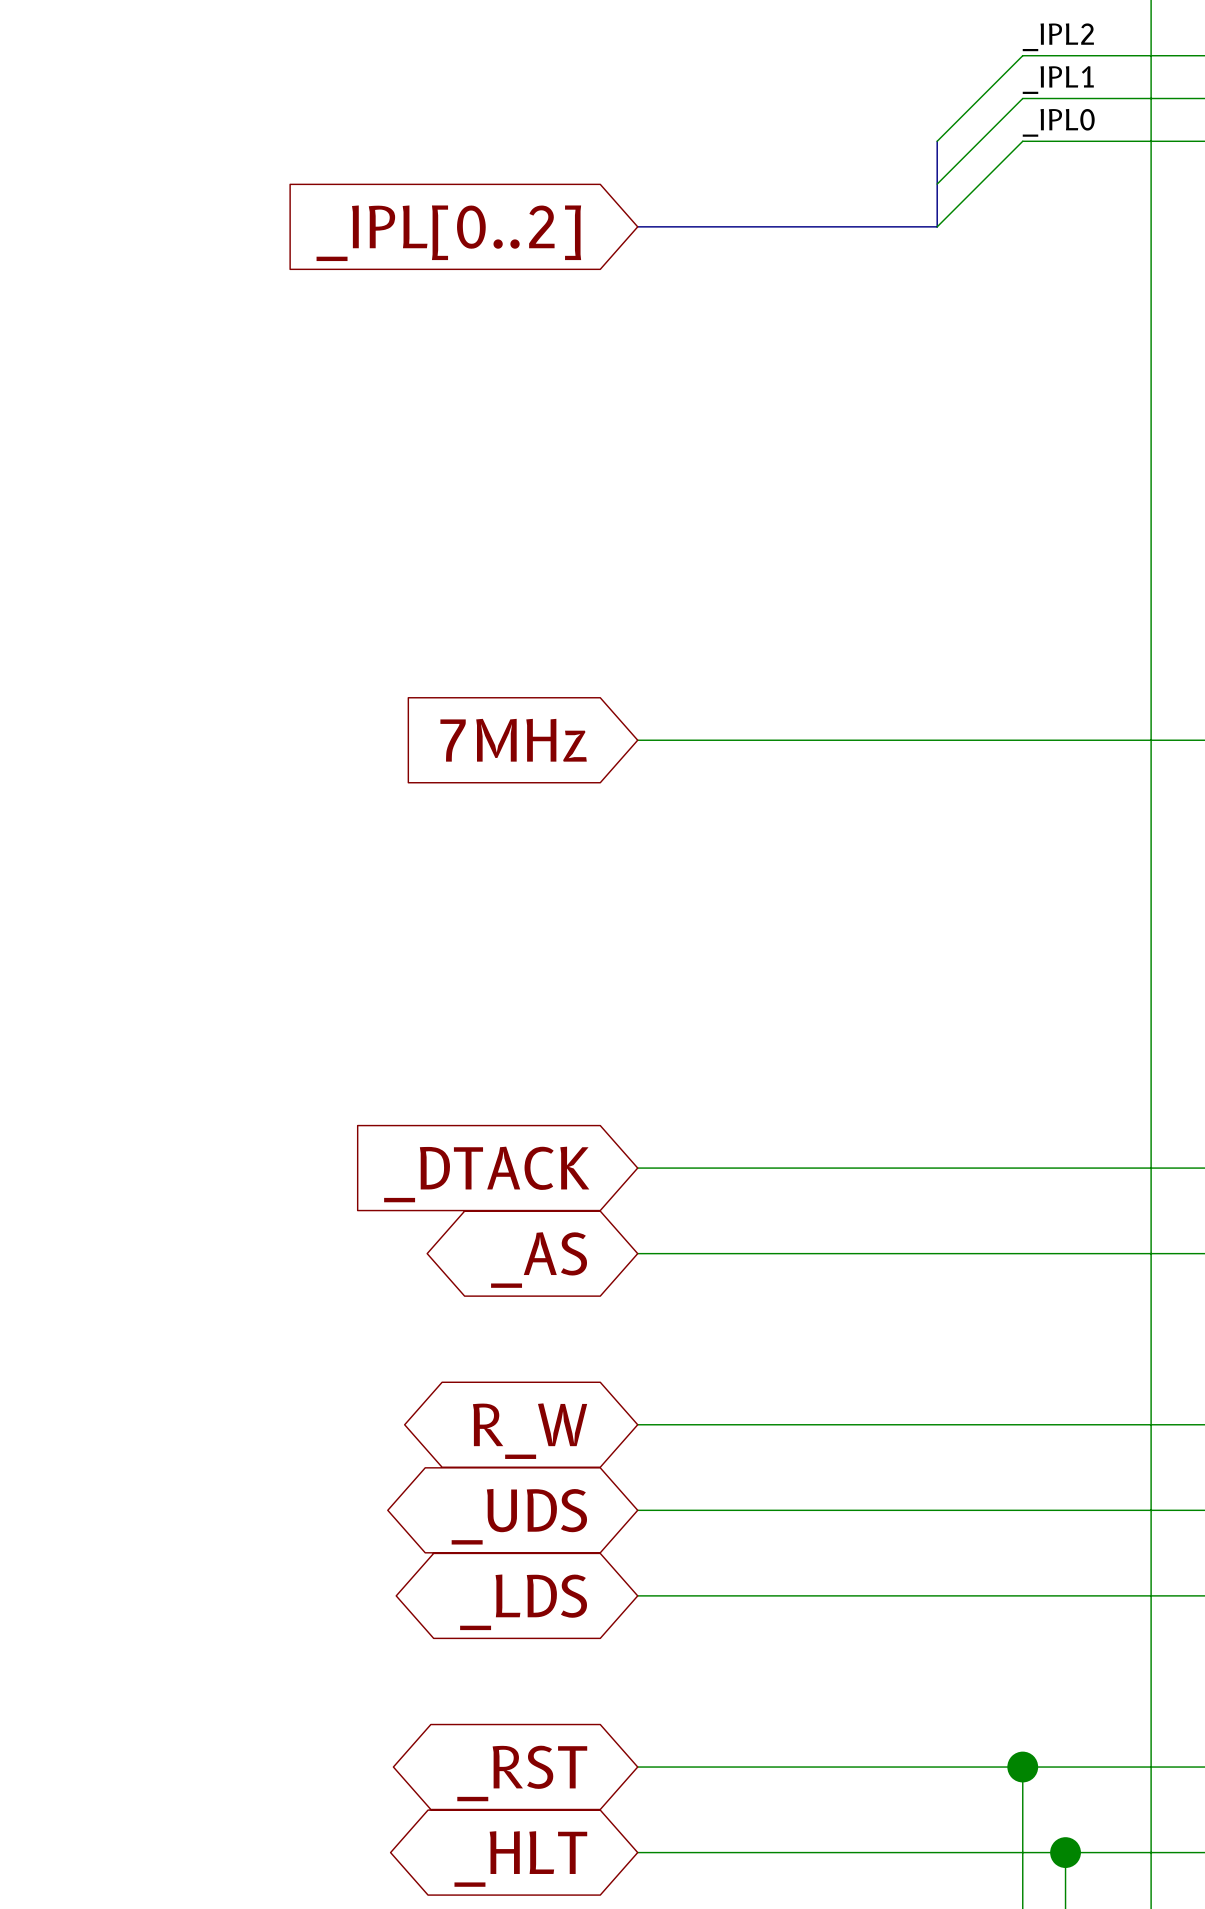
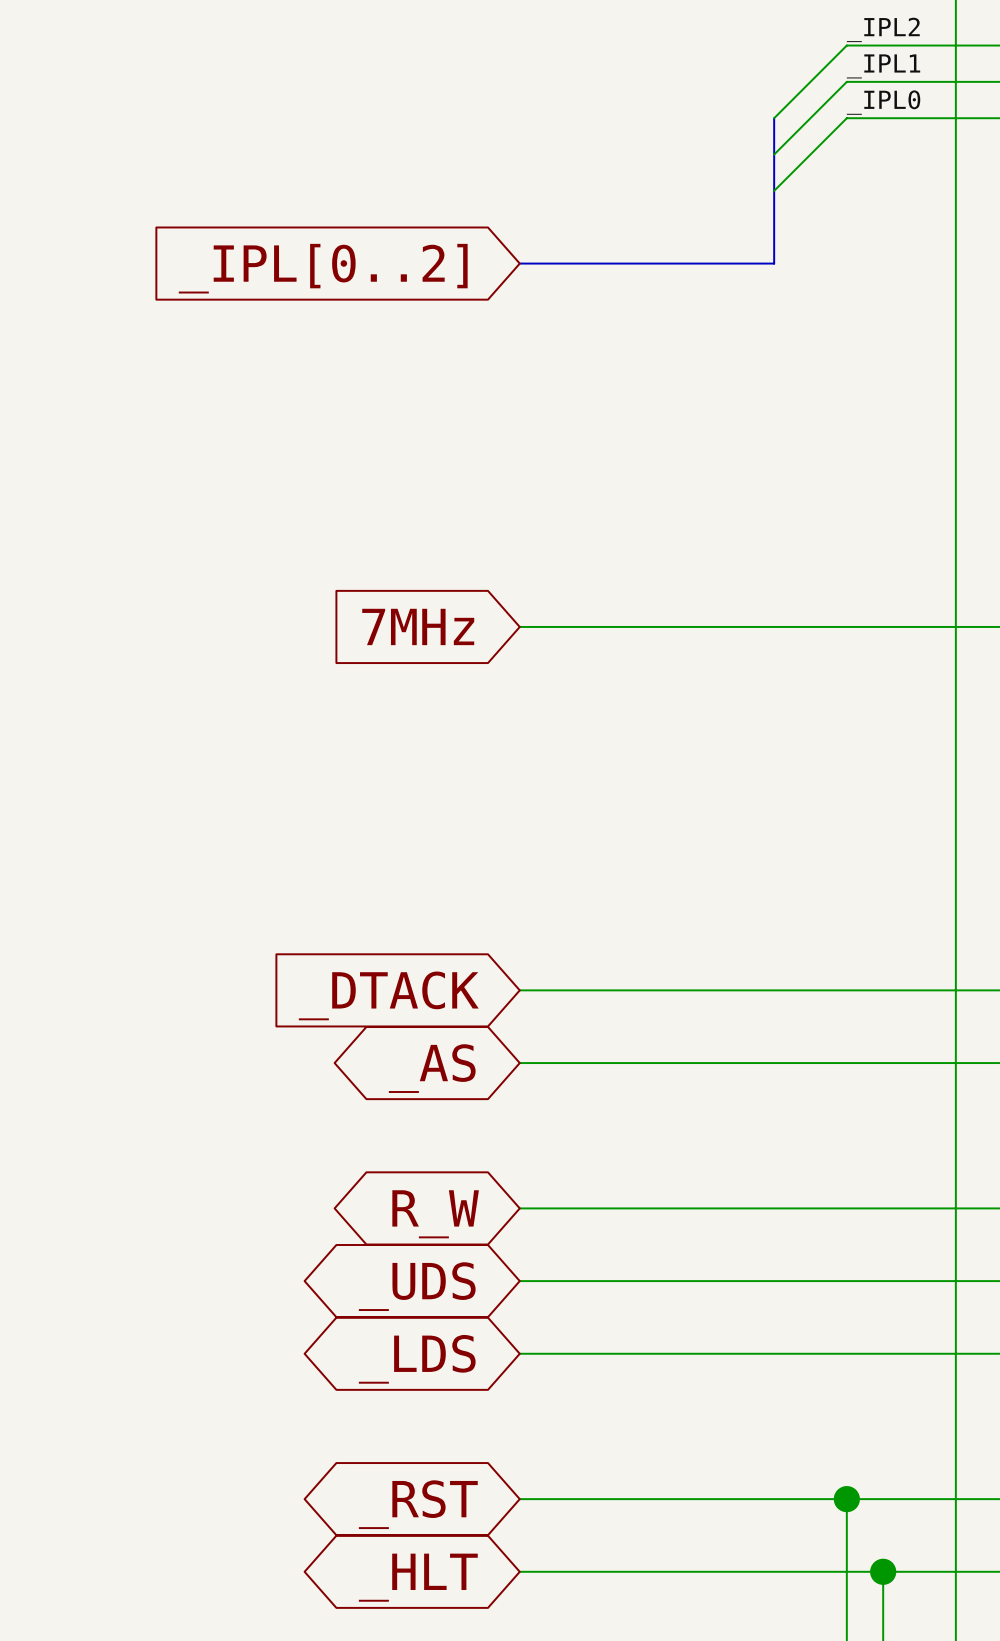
bus: (637, 226) (937, 226) -> (519, 263) (774, 263) (774, 190)
global label position: _IPL[0..2] (448, 233) -> _IPL[0..2] (323, 268)

